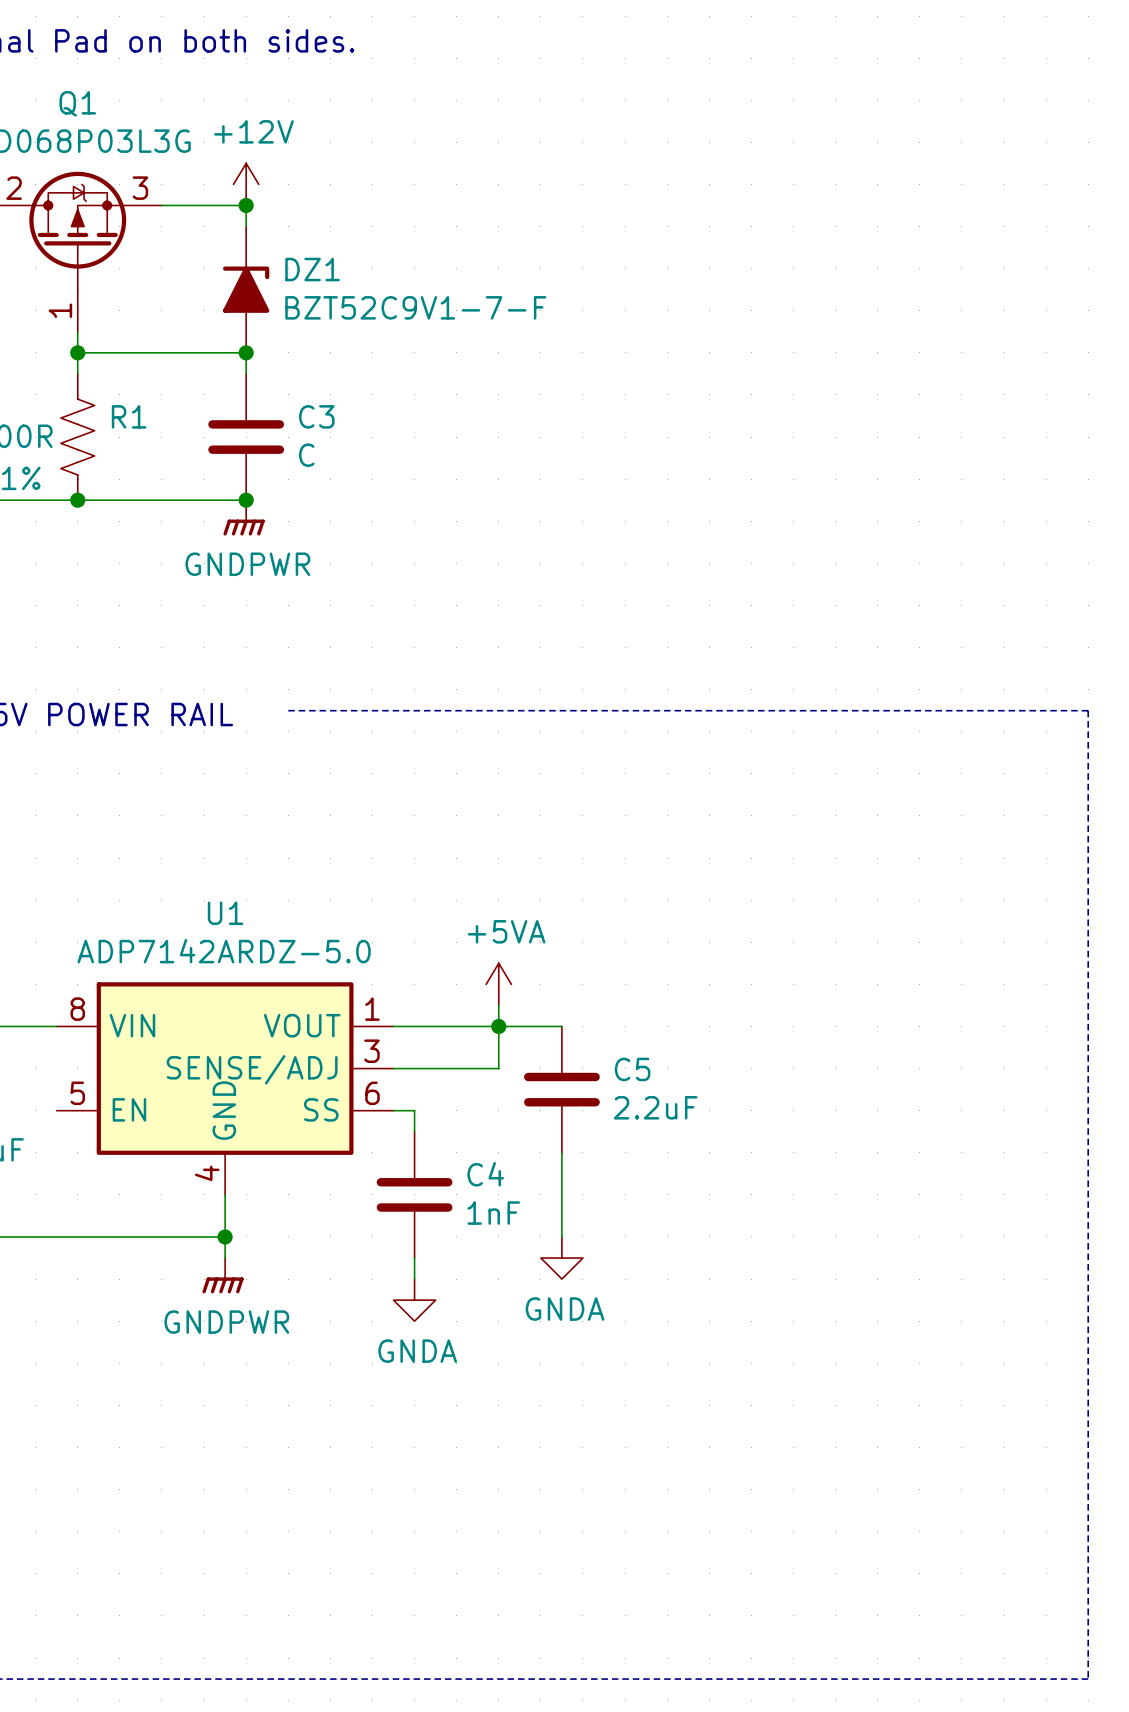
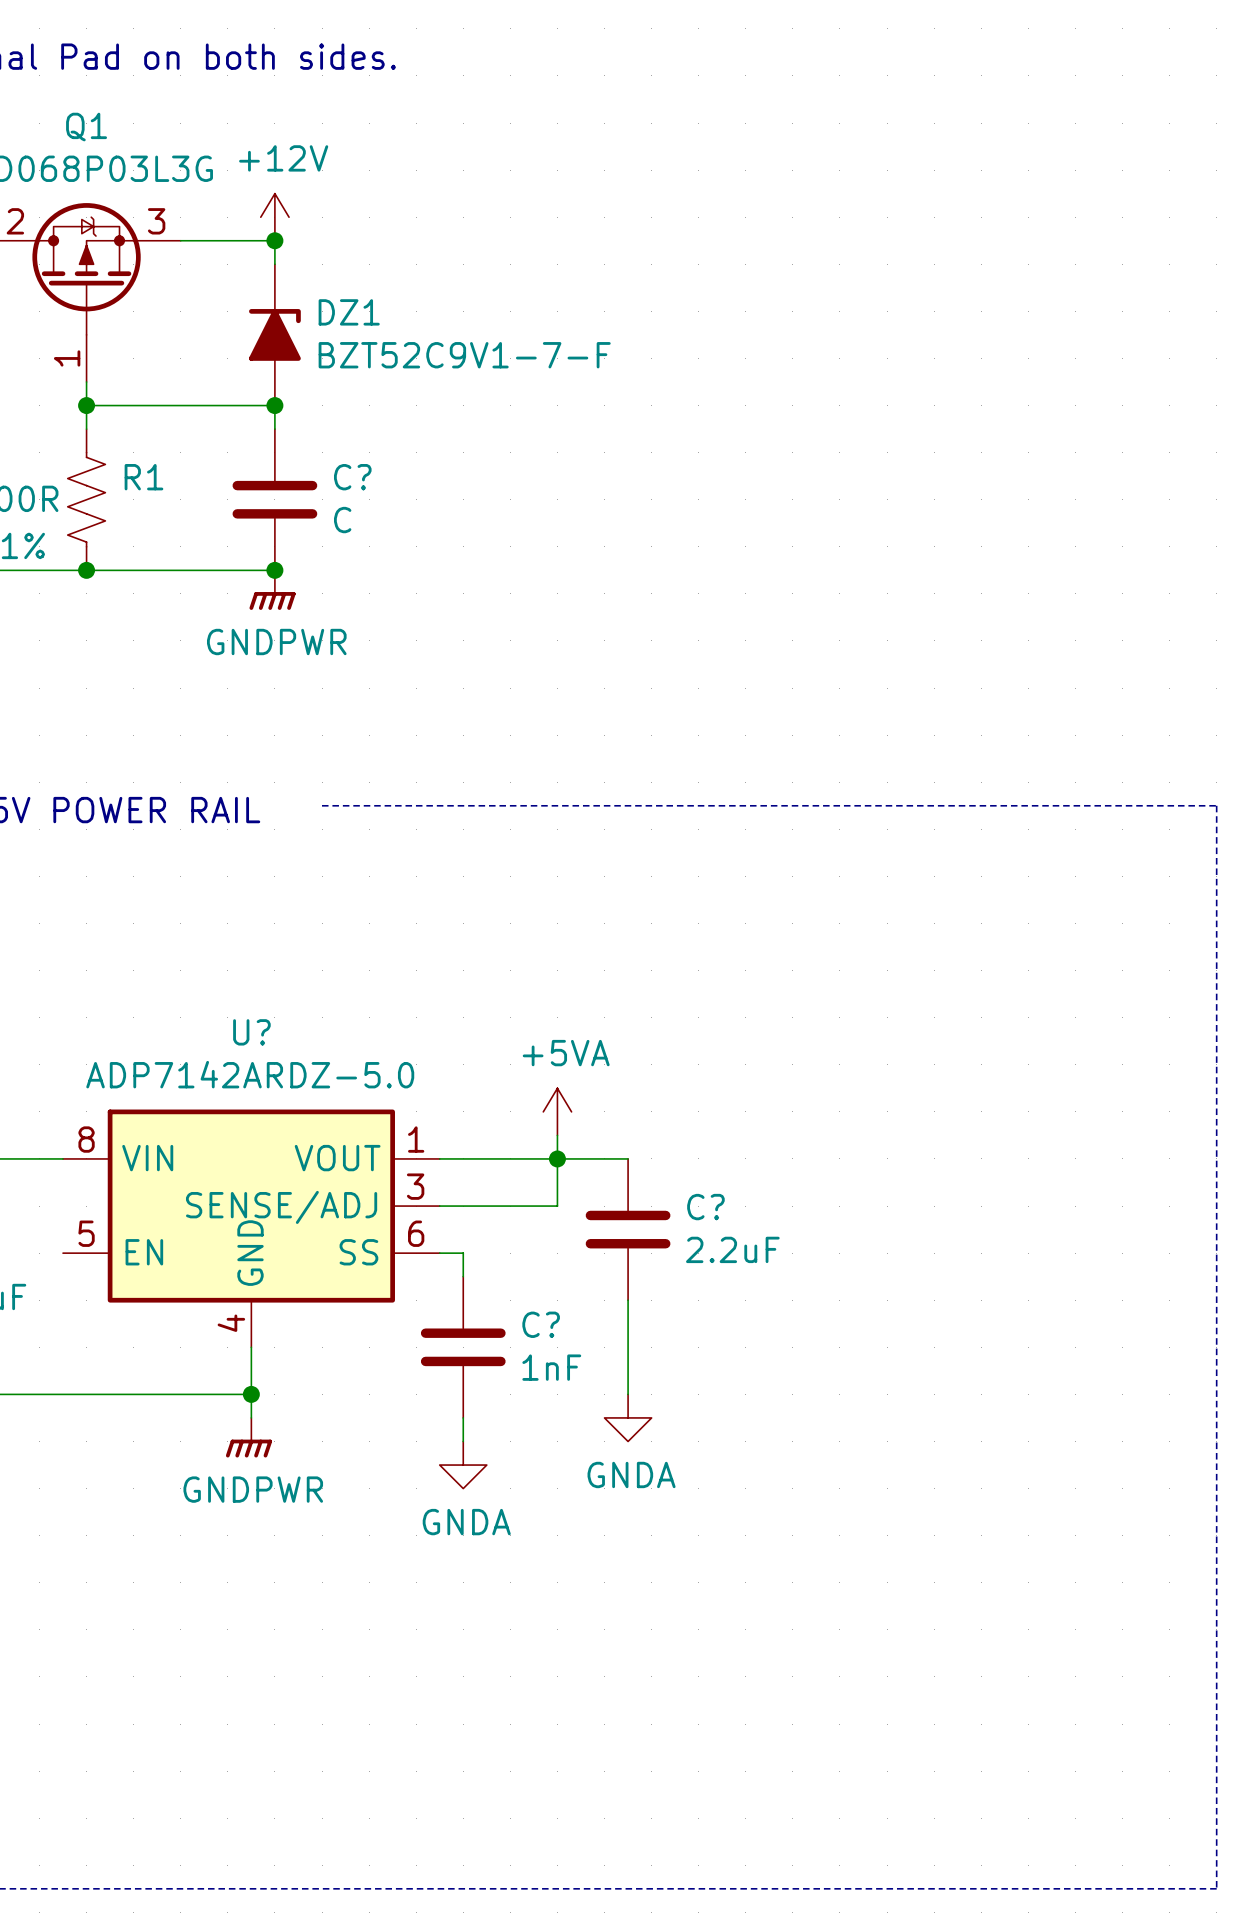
C3 name: C3 (316, 416) -> C? (352, 477)
U1 name: U1 (225, 913) -> U? (251, 1032)
C5 name: C5 (632, 1069) -> C? (705, 1207)
C4 name: C4 (485, 1174) -> C? (541, 1324)

